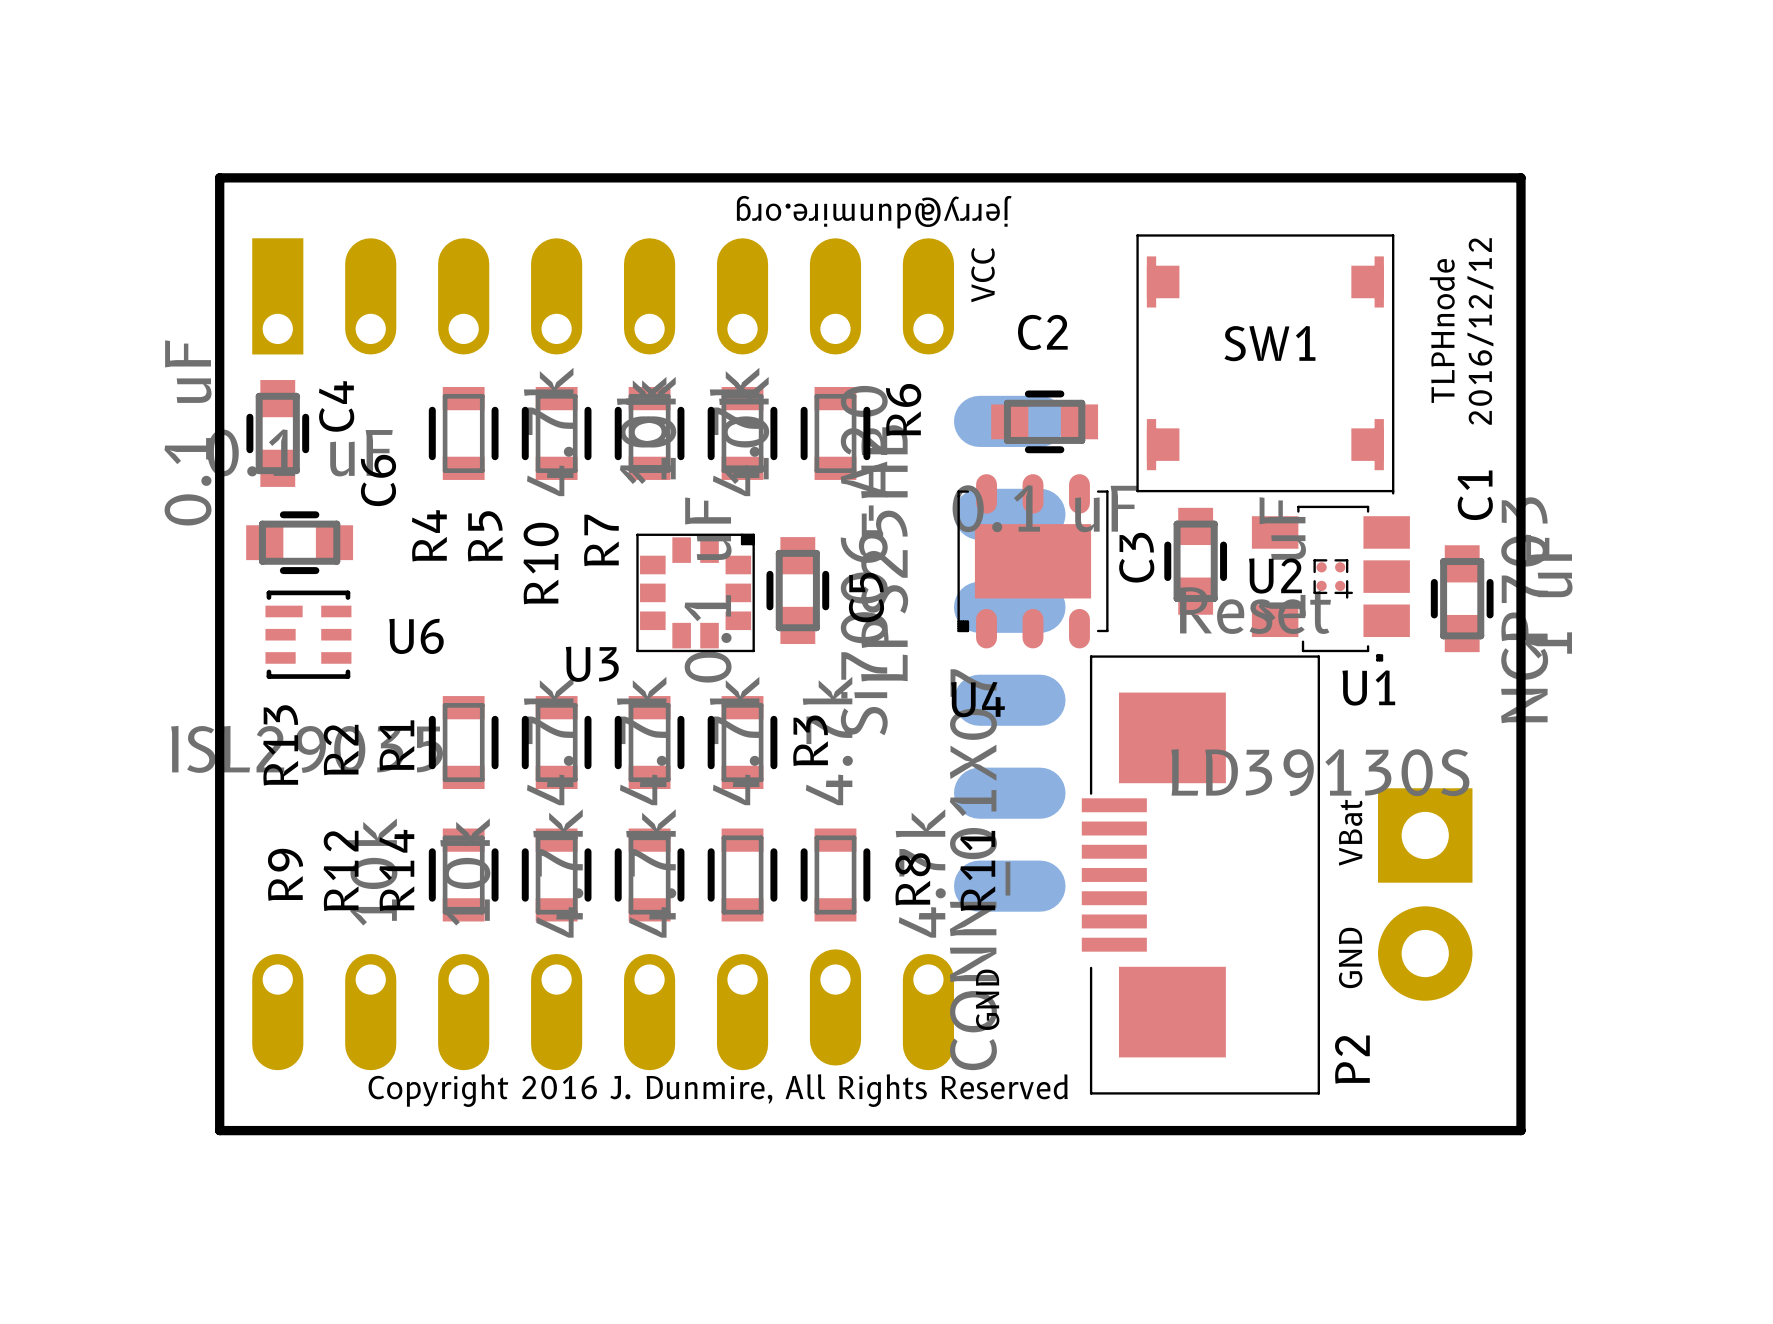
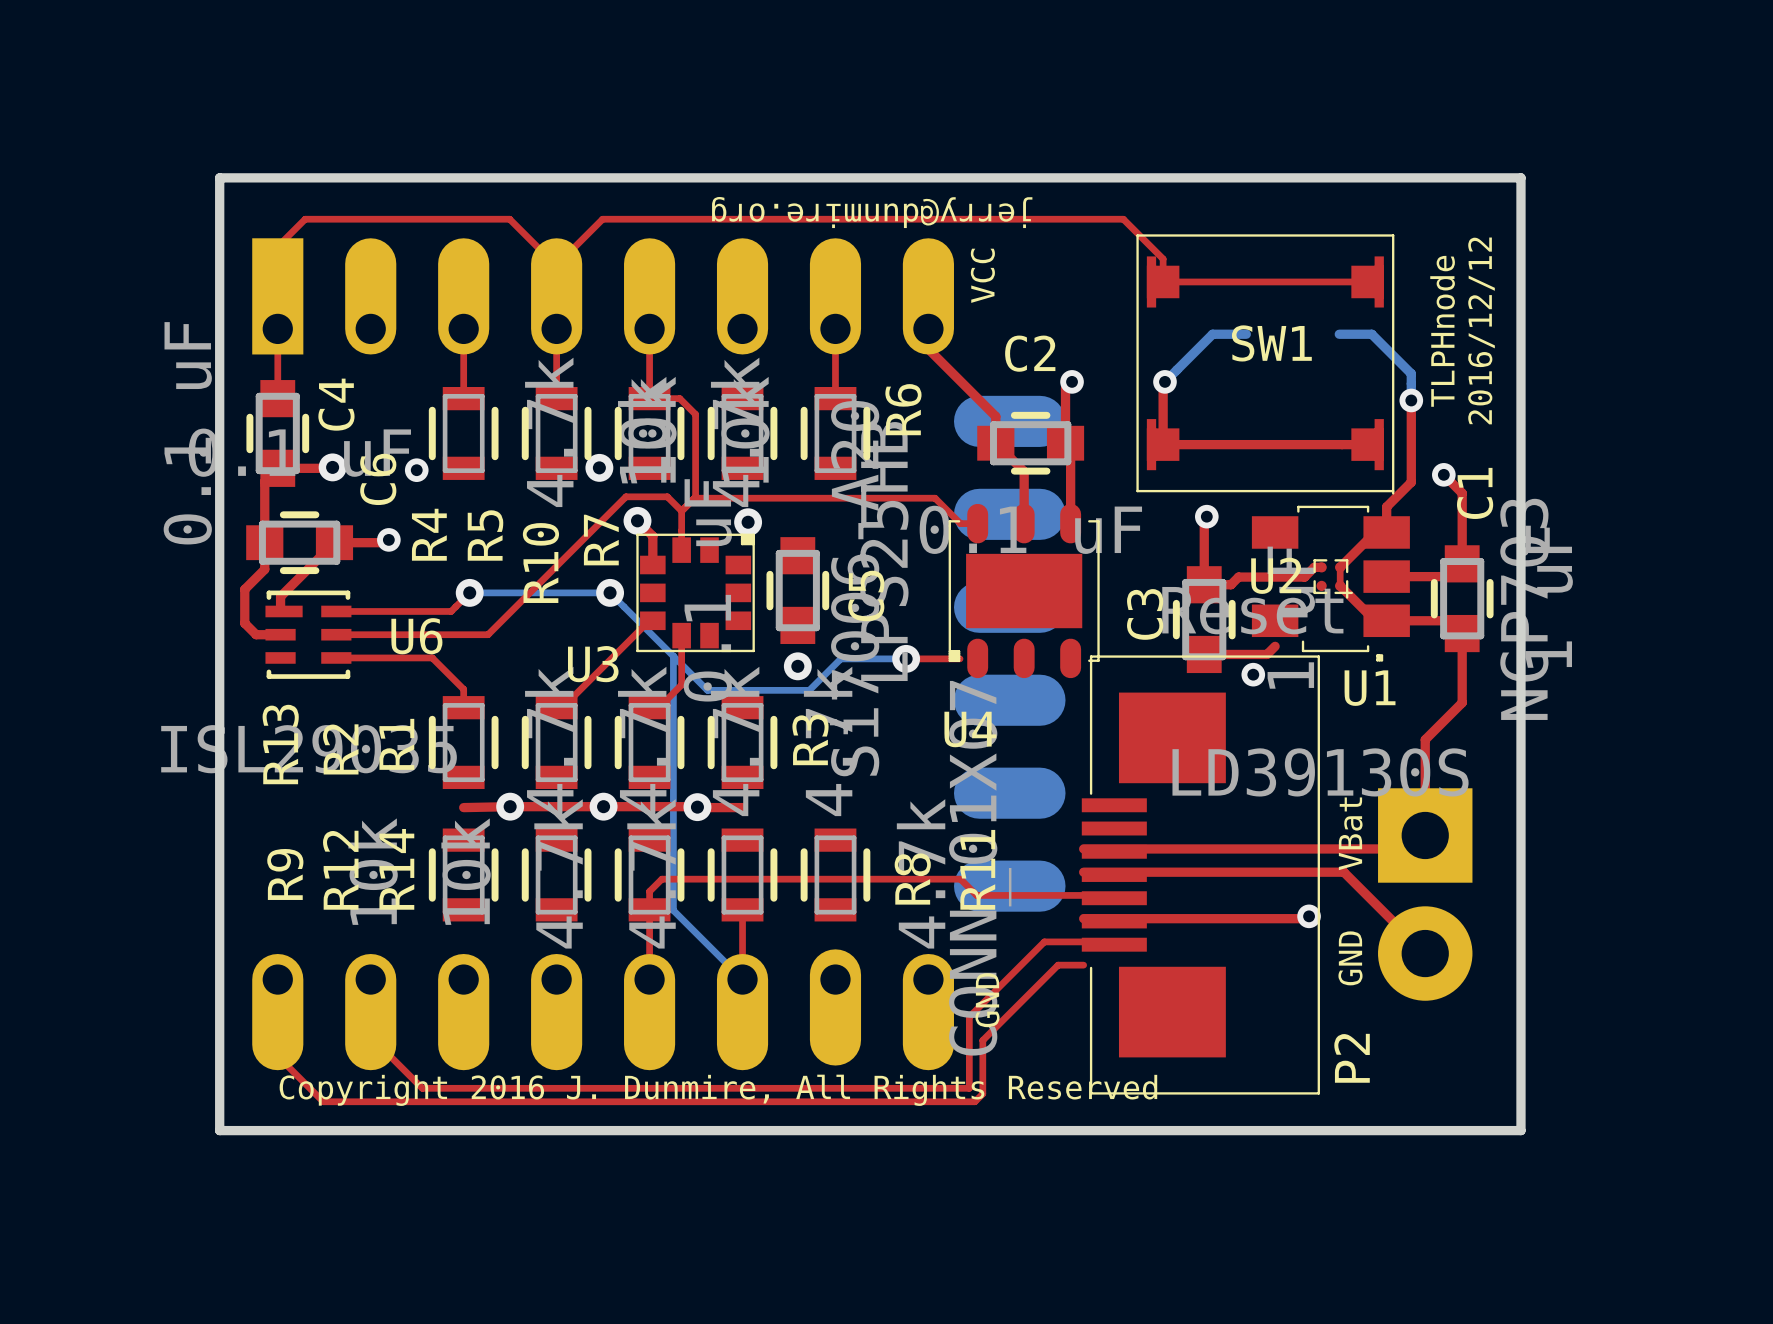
top track: none -> (556, 266) (509, 219) (305, 219) (277, 246) (277, 398)
top track: none -> (1367, 281) (1163, 281) (1163, 258) (1123, 219) (602, 219) (556, 265) (556, 398)
top track: none -> (463, 328) (463, 398)
top track: none -> (649, 328) (649, 398) (679, 398) (695, 414) (695, 497) (681, 511)
top track: none -> (835, 328) (835, 398)
top track: none -> (928, 328) (928, 349) (995, 416) (995, 443) (1024, 471) (1024, 523)
bottom track: none -> (1246, 334) (1212, 334) (1164, 381)
bottom track: none -> (1339, 334) (1371, 334) (1411, 373) (1411, 400)
top track: none -> (1072, 381) (1065, 388) (1065, 443) (1070, 448) (1070, 523)
via: none -> (1072, 381)
top track: none -> (1164, 381) (1163, 383) (1163, 444) (1367, 444)
via: none -> (1164, 381)
top track: none -> (1411, 400) (1411, 482) (1386, 506) (1386, 532) (1375, 532) (1340, 567) (1340, 585) (1375, 620) (1449, 620) (1462, 633) (1462, 702) (1425, 739) (1425, 835) (1411, 848) (1083, 848)
via: none -> (1411, 400)
C2 position: (1044, 421) -> (1030, 443)
top track: none -> (332, 467) (277, 468) (264, 481) (264, 569) (244, 589) (244, 623) (256, 634) (280, 634)
via: none -> (332, 467)
via: none -> (599, 467)
via: none -> (416, 470)
top track: none -> (1443, 474) (1462, 493) (1462, 563) (1449, 576) (1386, 576)
via: none -> (1443, 474)
top track: none -> (694, 498) (935, 498) (960, 523) (977, 523)
top track: none -> (681, 511) (681, 550)
top track: none -> (681, 511) (667, 496) (625, 496) (488, 634) (336, 634)
top track: none -> (1206, 516) (1204, 519) (1204, 584) (1230, 584) (1238, 577) (1304, 577) (1314, 567) (1321, 567)
via: none -> (1206, 516)
top track: none -> (637, 520) (652, 536) (652, 565)
via: none -> (637, 520)
via: none -> (748, 522)
top track: none -> (388, 539) (386, 542) (334, 542) (280, 596) (280, 611)
via: none -> (388, 539)
U4 position: (1032, 561) -> (1024, 591)
C3 position: (1195, 561) -> (1204, 619)
top track: none -> (469, 592) (451, 611) (336, 611)
bottom track: none -> (469, 592) (610, 592) (707, 690) (809, 690) (840, 658) (906, 658)
via: none -> (469, 592)
via: none -> (610, 592)
top track: none -> (652, 620) (649, 620) (562, 707) (556, 707)
top track: none -> (681, 635) (681, 684) (658, 707) (649, 707)
top track: none -> (1275, 646) (1267, 654) (1204, 654)
bottom track: none -> (673, 656) (673, 910) (742, 979)
top track: none -> (336, 657) (432, 657) (463, 689) (463, 707)
top track: none -> (906, 658) (960, 658)
via: none -> (906, 658)
via: none -> (797, 666)
via: none -> (1253, 674)
via: none -> (510, 806)
via: none -> (603, 806)
top track: none -> (696, 806) (463, 807)
top track: none -> (697, 807) (742, 807)
via: none -> (697, 807)
top track: none -> (1083, 872) (1343, 872) (1425, 953)
top track: none -> (1083, 895) (976, 895) (960, 879) (661, 879) (649, 891) (649, 979)
top track: none -> (742, 909) (742, 979)
top track: none -> (1309, 916) (1306, 918) (1083, 918)
via: none -> (1309, 916)
top track: none -> (1083, 941) (1044, 941) (969, 1016) (969, 1088) (422, 1088) (370, 1036) (370, 979)
top track: none -> (1083, 965) (1058, 965) (982, 1040) (982, 1093) (974, 1101) (323, 1101) (277, 1056) (277, 979)

